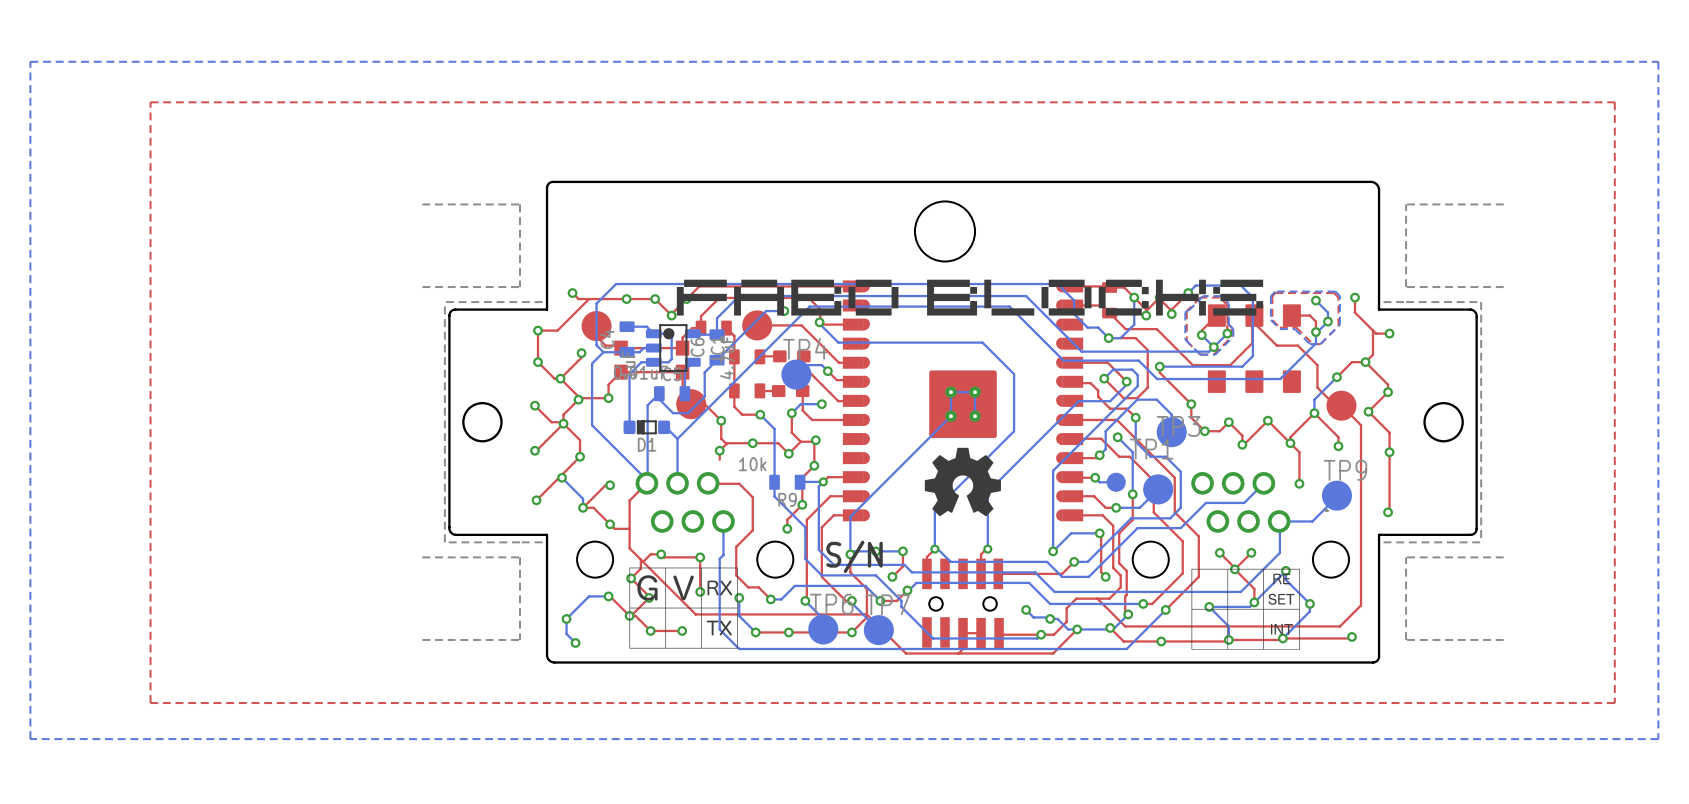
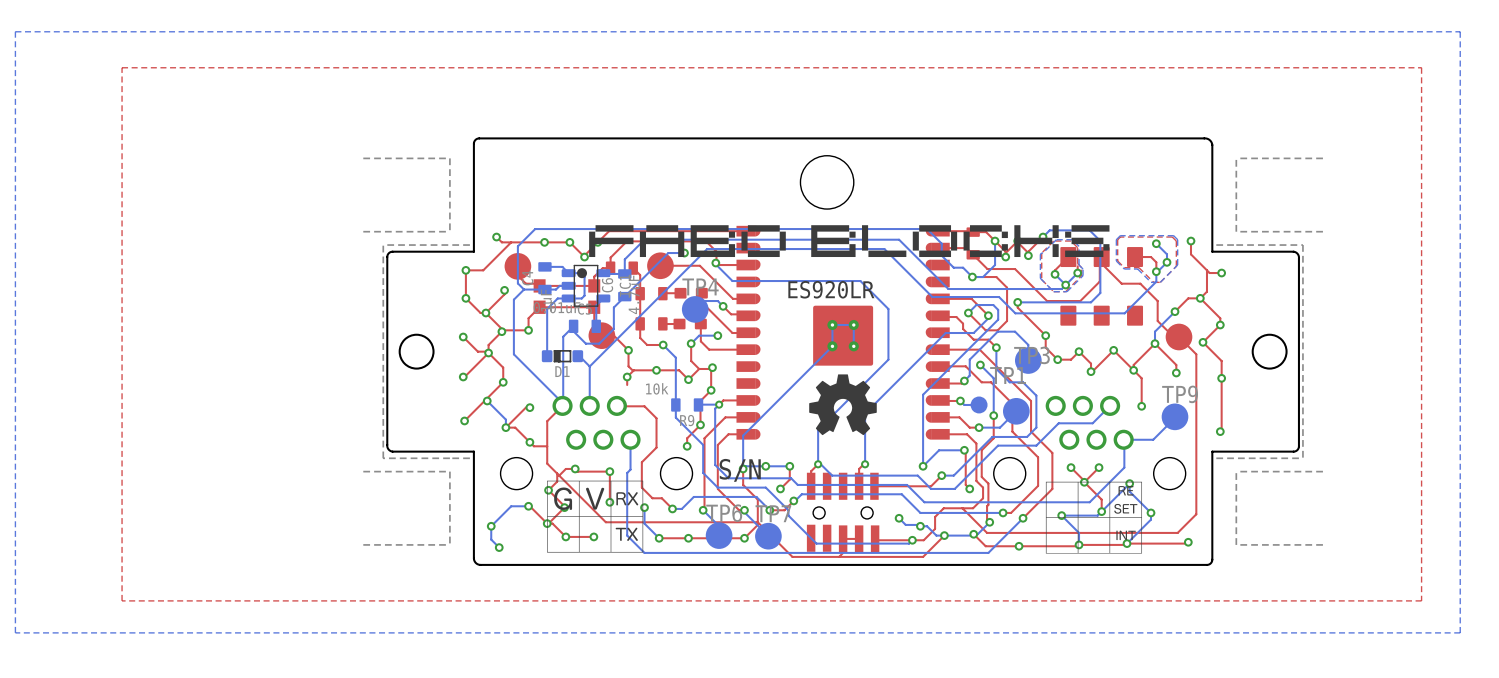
text: none -> ES920LR (831, 289)

